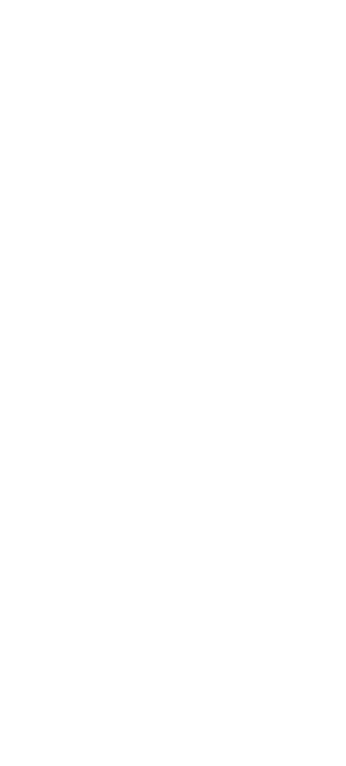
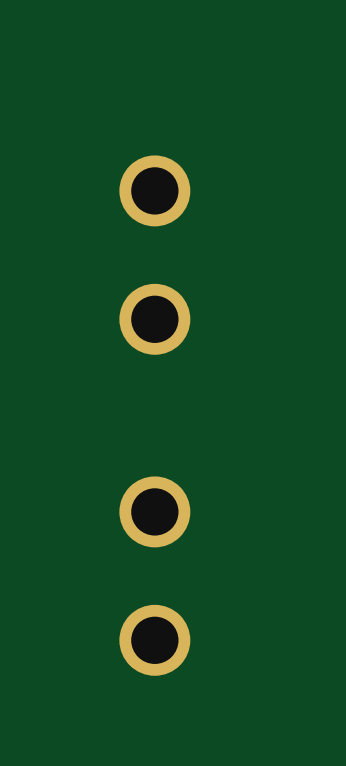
part: none -> (154, 190)
part: none -> (154, 319)
part: none -> (154, 511)
part: none -> (154, 640)

